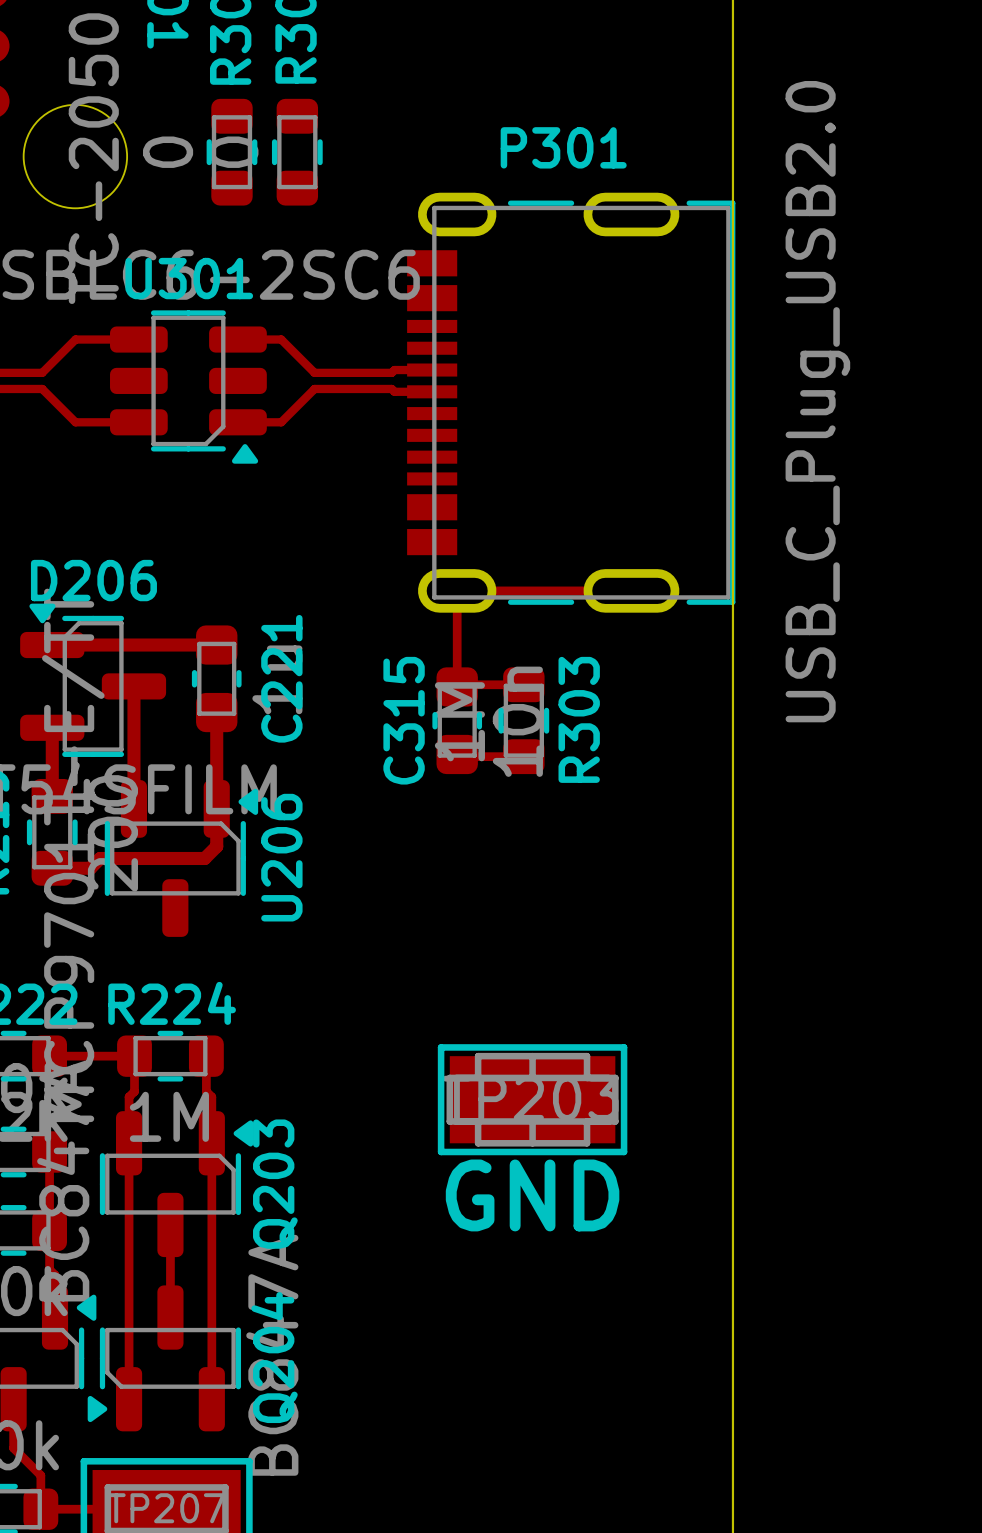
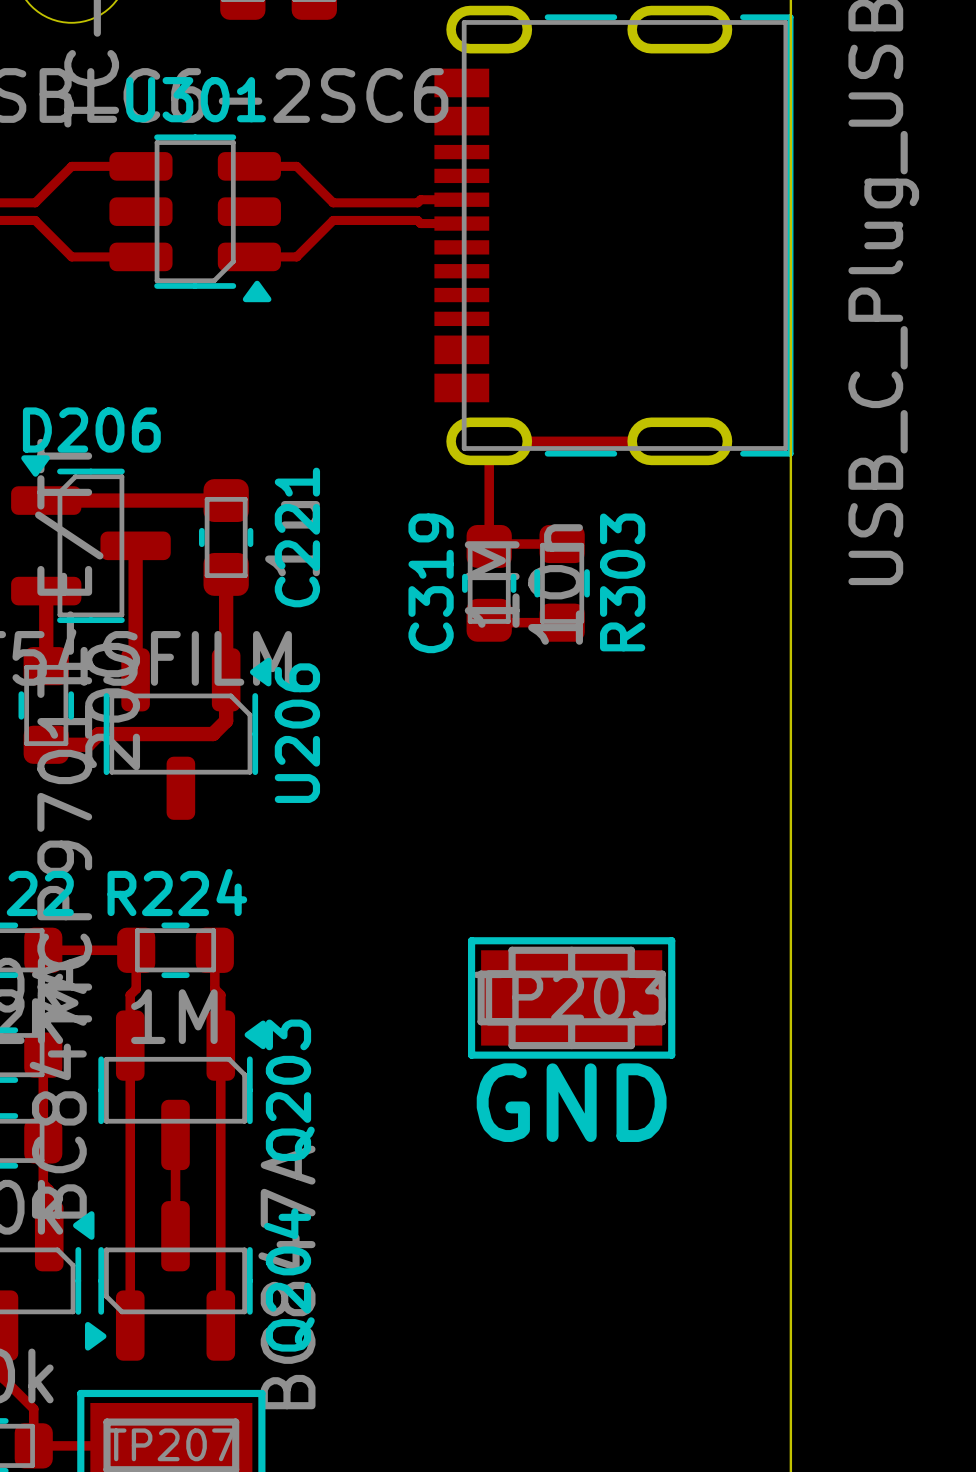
C315 name: C315 (404, 720) -> C319 (431, 583)

